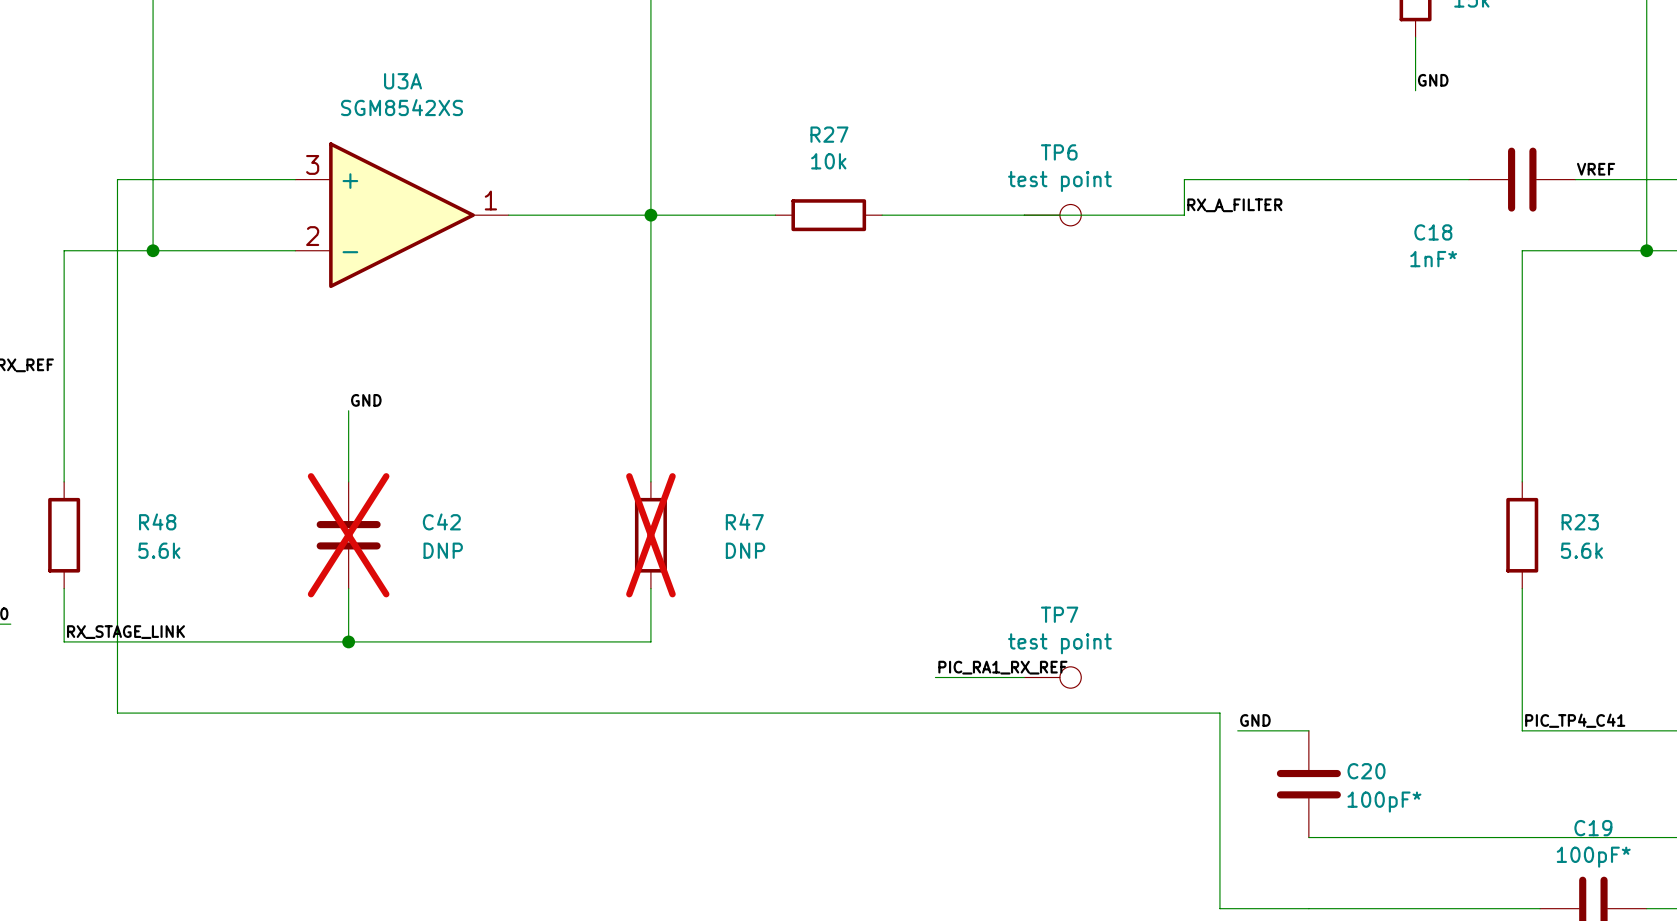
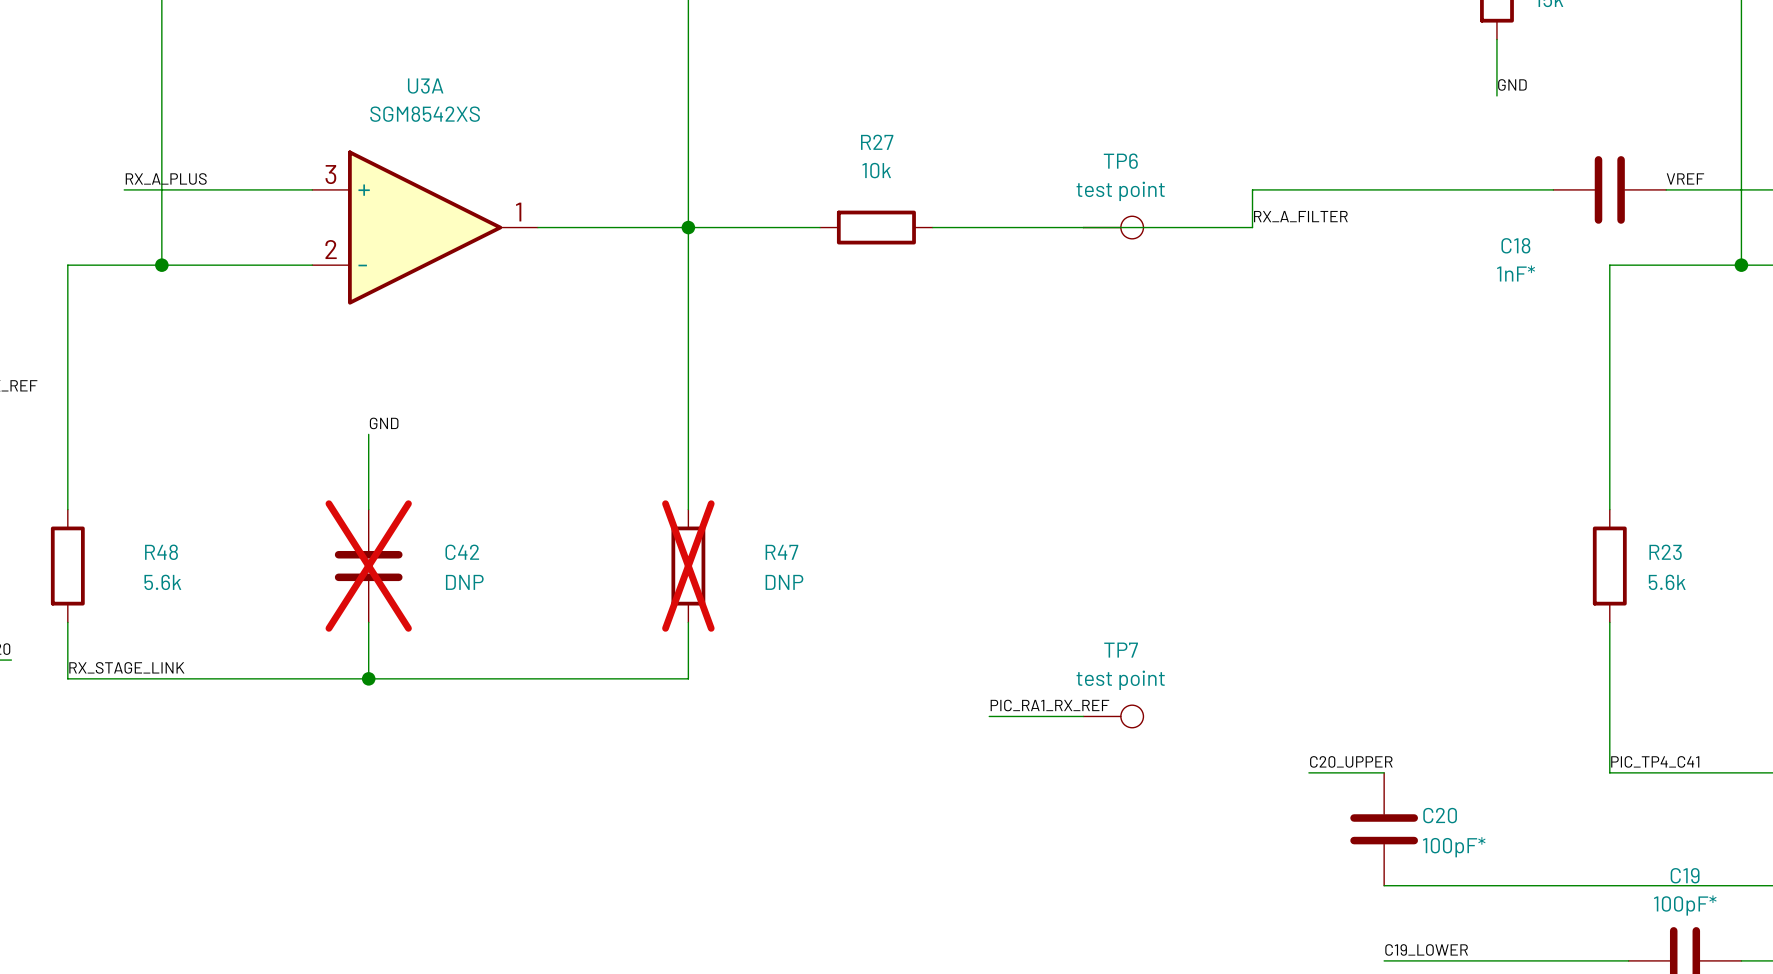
label: none -> RX_A_PLUS (166, 178)
wire: (117, 179) (117, 713) (1219, 713) (1219, 908) (1308, 908) -> none
label: GND (1255, 720) -> C20_UPPER (1351, 761)
label: none -> C19_LOWER (1426, 949)

